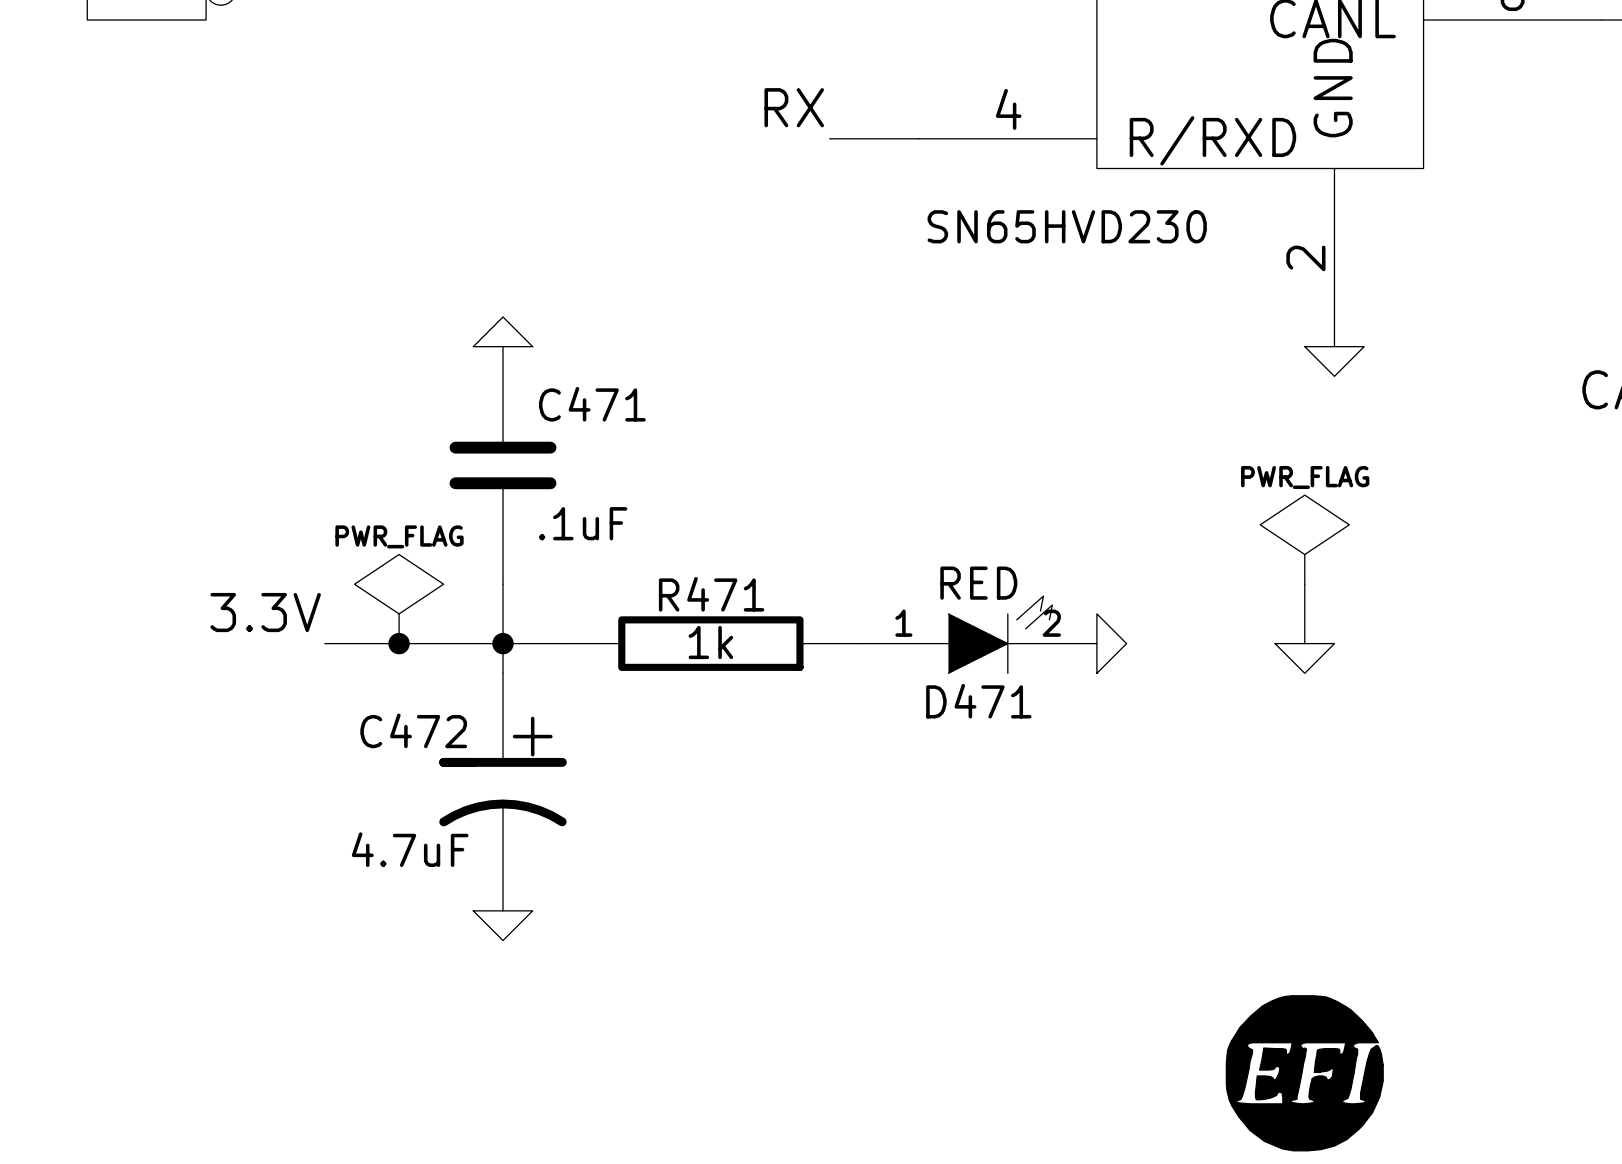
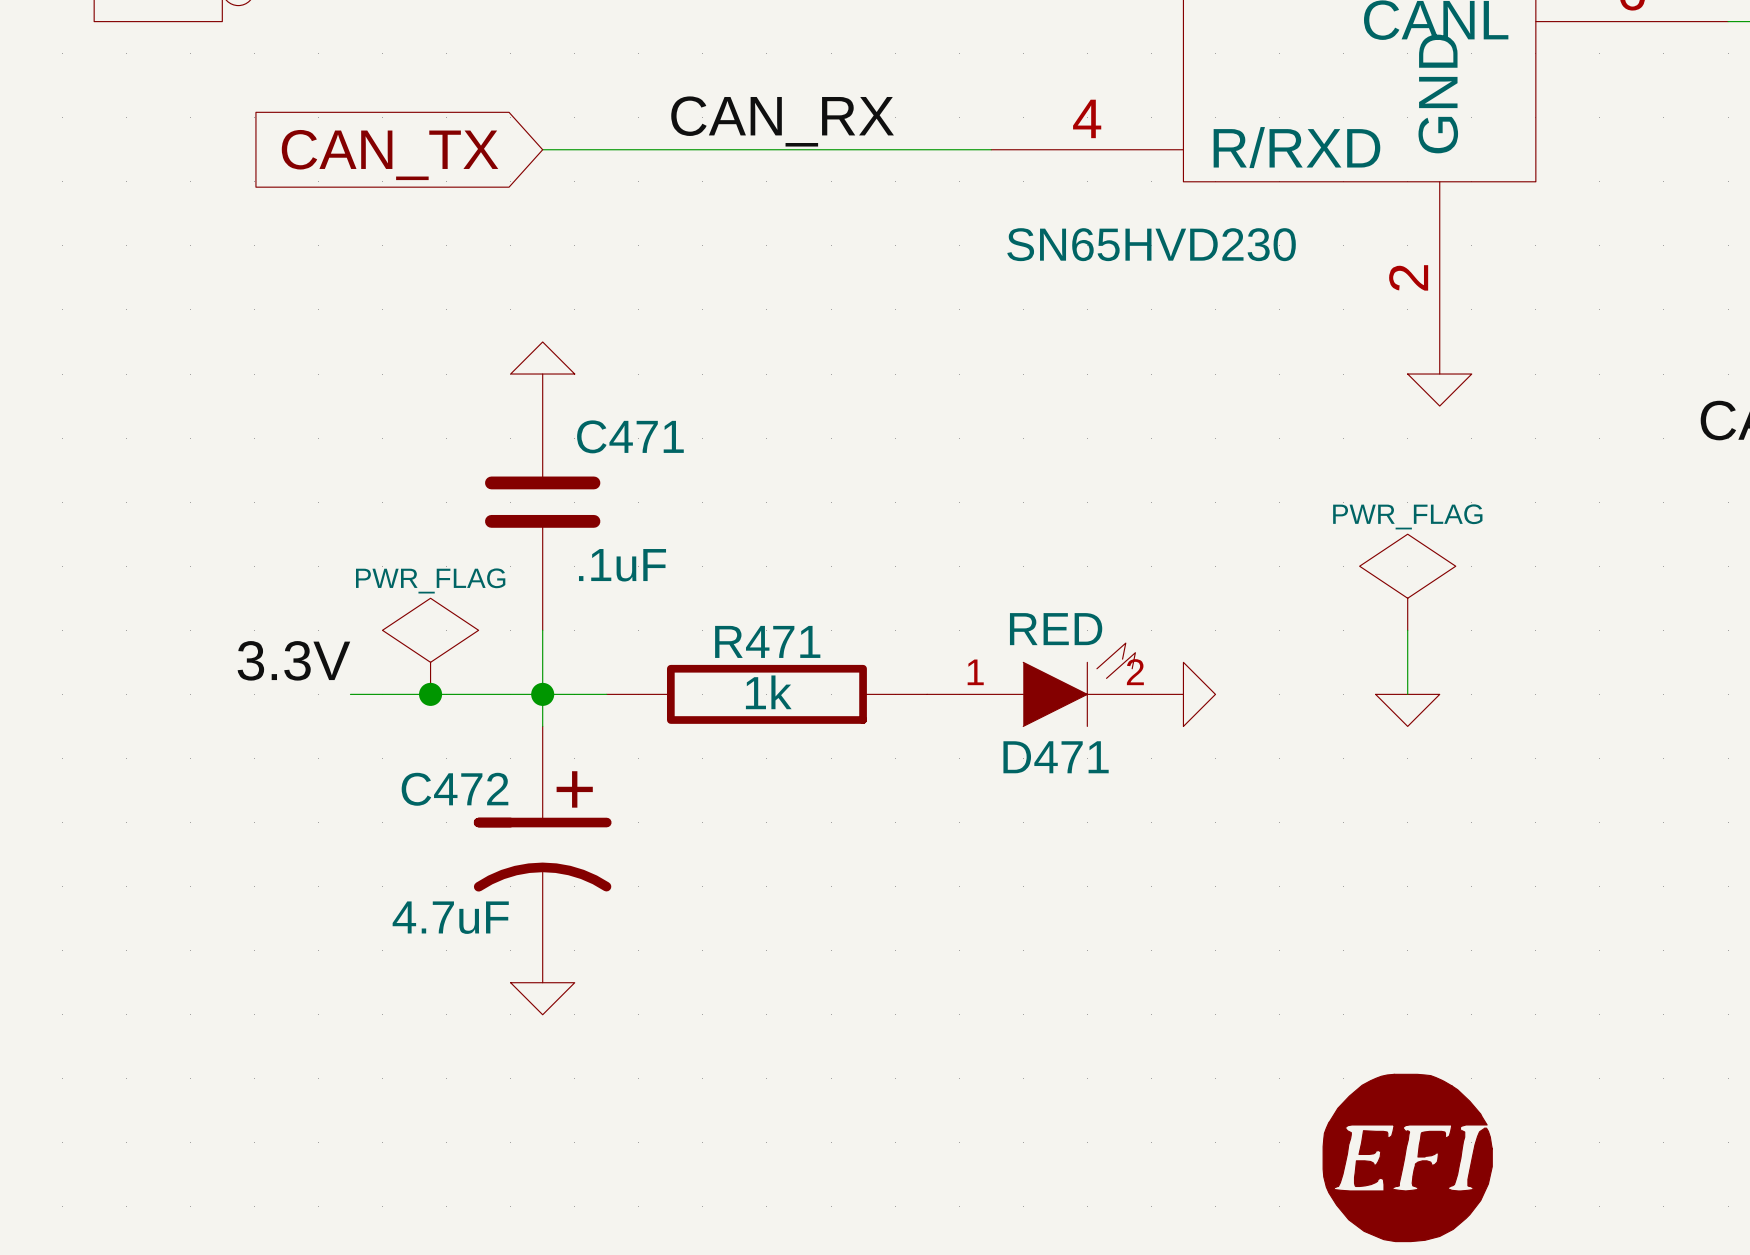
label: RX (794, 107) -> CAN_RX (782, 121)
wire: none -> (542, 149) (895, 149)
global label: none -> CAN_TX (390, 155)

